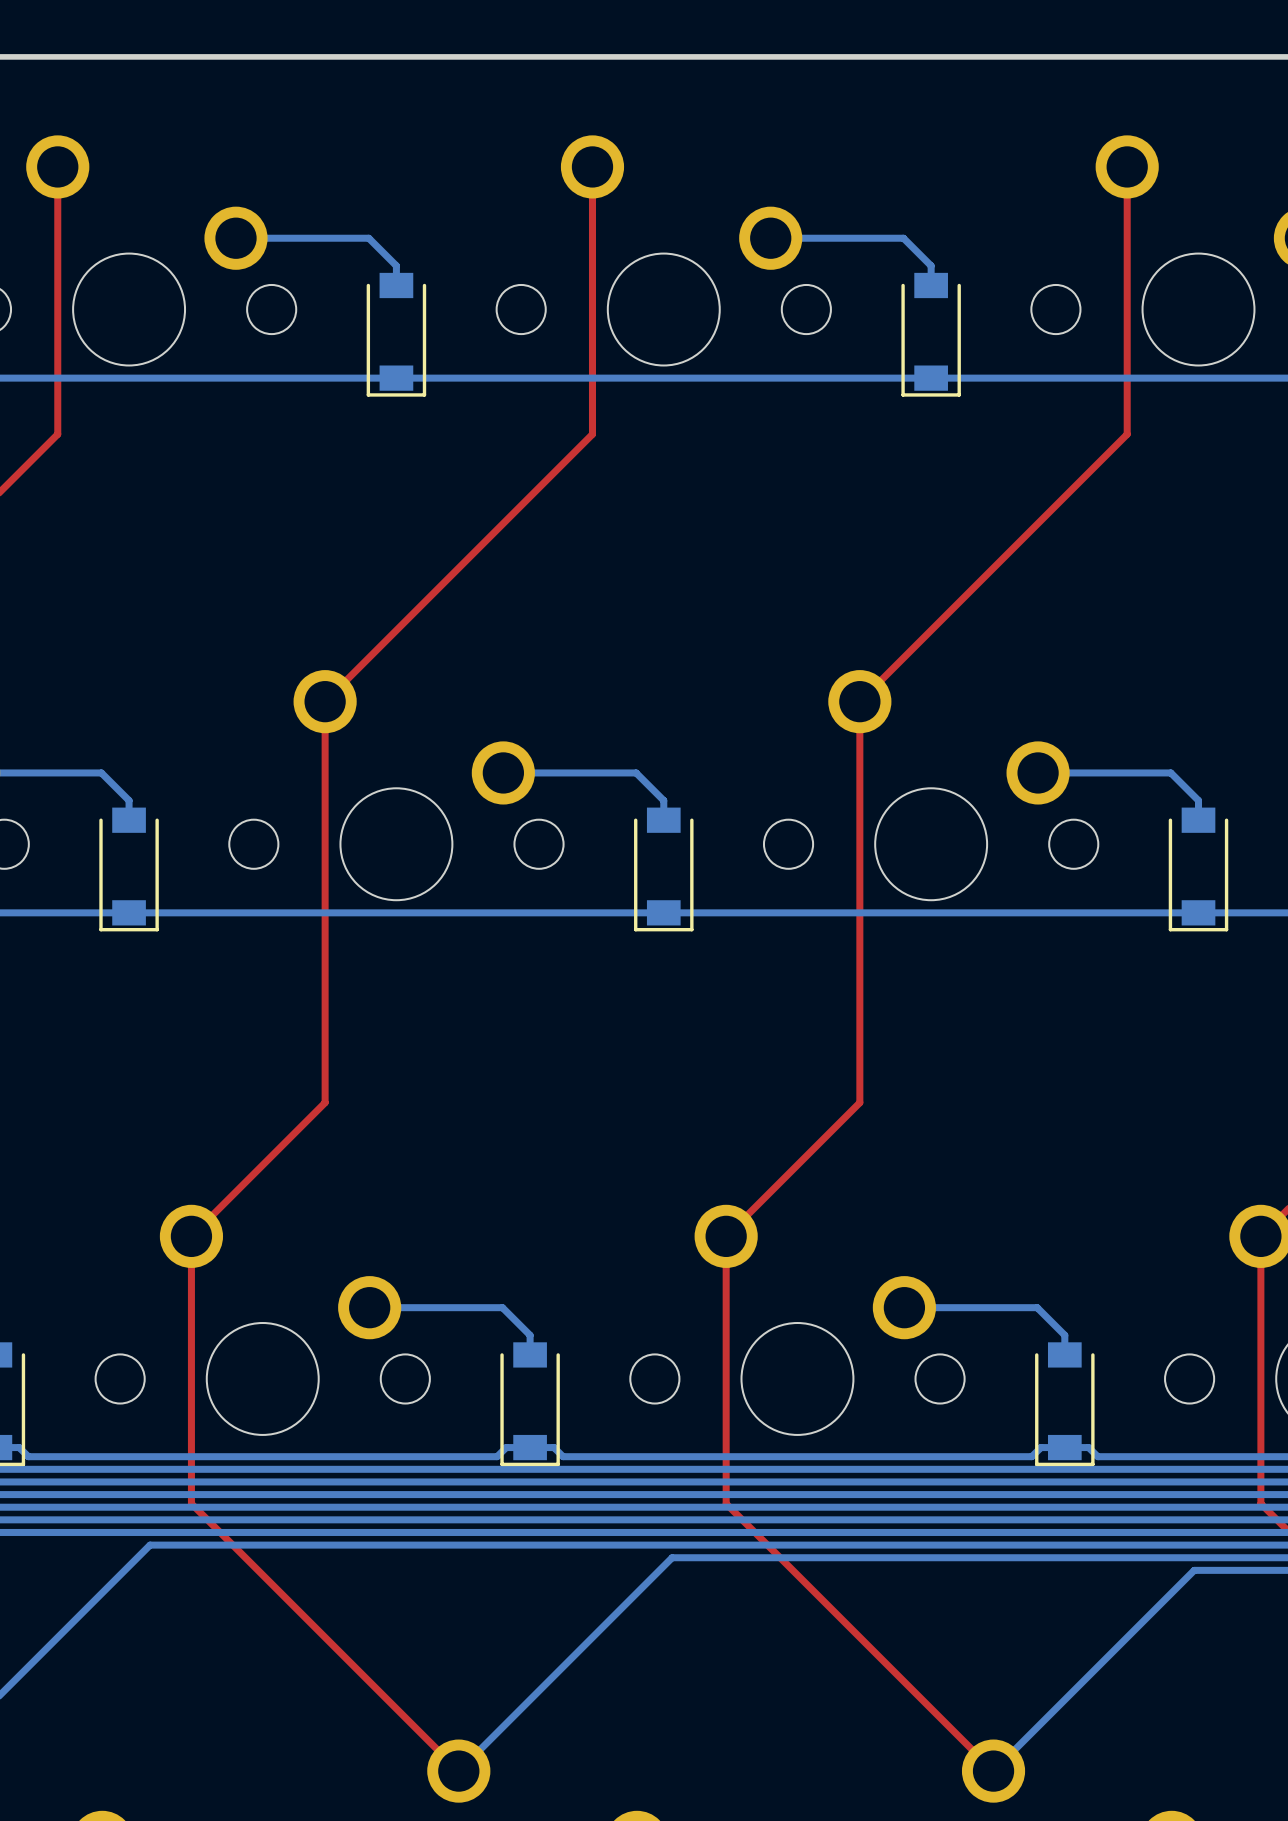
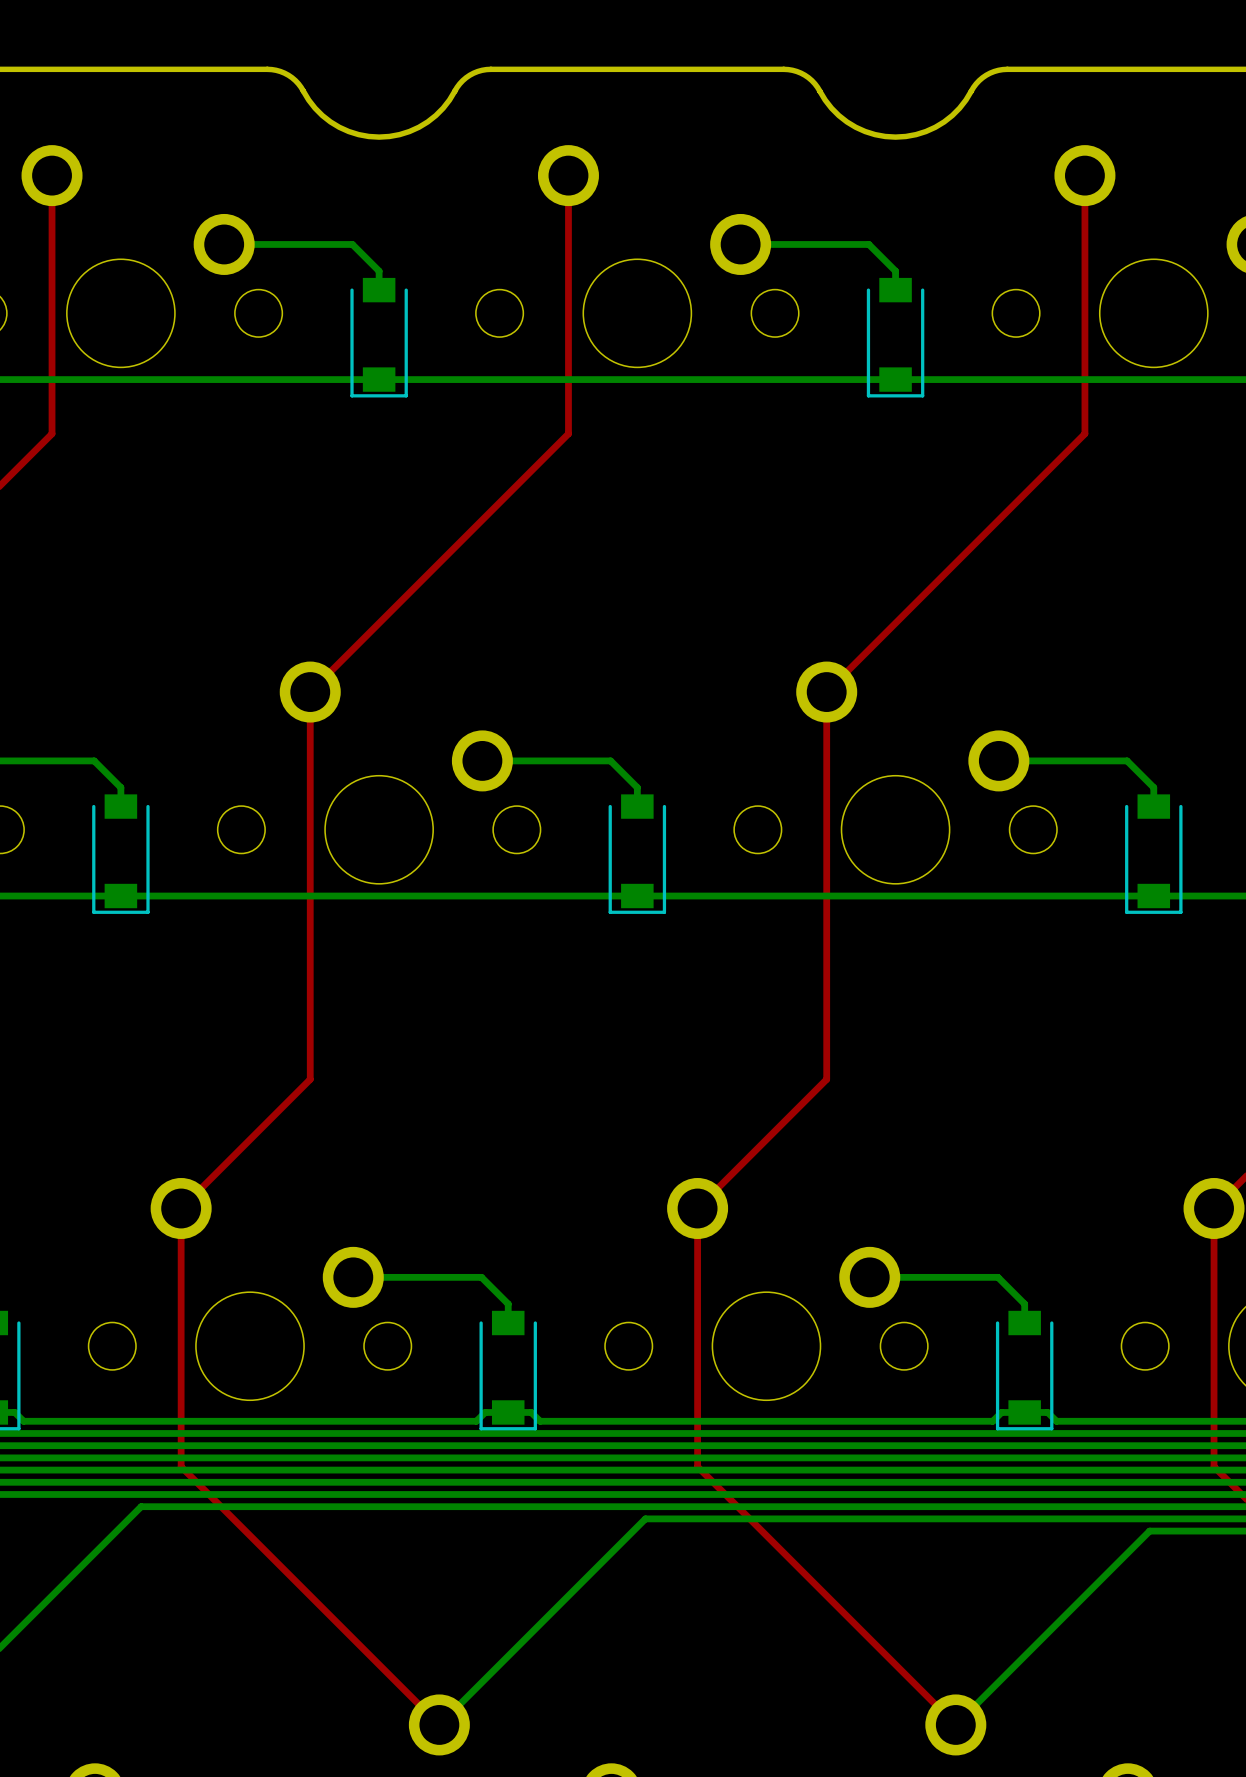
board edge: (512, 56) (280, 56) -> (490, 69) (477, 71) (466, 77) (443, 108) (427, 121) (399, 134) (379, 137) (358, 134) (330, 121) (315, 108) (292, 77) (280, 71) (267, 69)
board edge: (1046, 56) (815, 56) -> (1007, 69) (994, 71) (982, 77) (959, 108) (944, 121) (916, 134) (895, 137) (875, 134) (846, 121) (831, 108) (808, 77) (796, 71) (783, 69)

